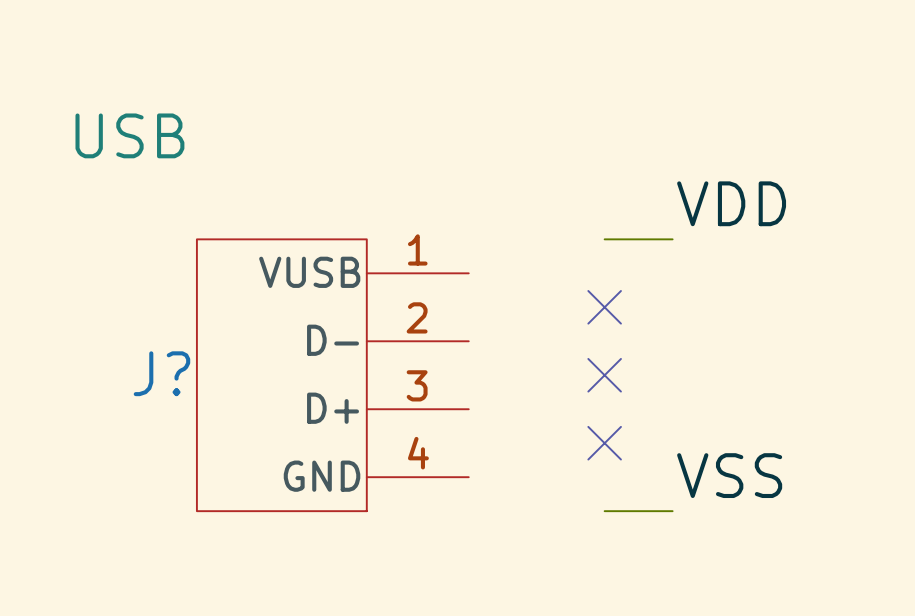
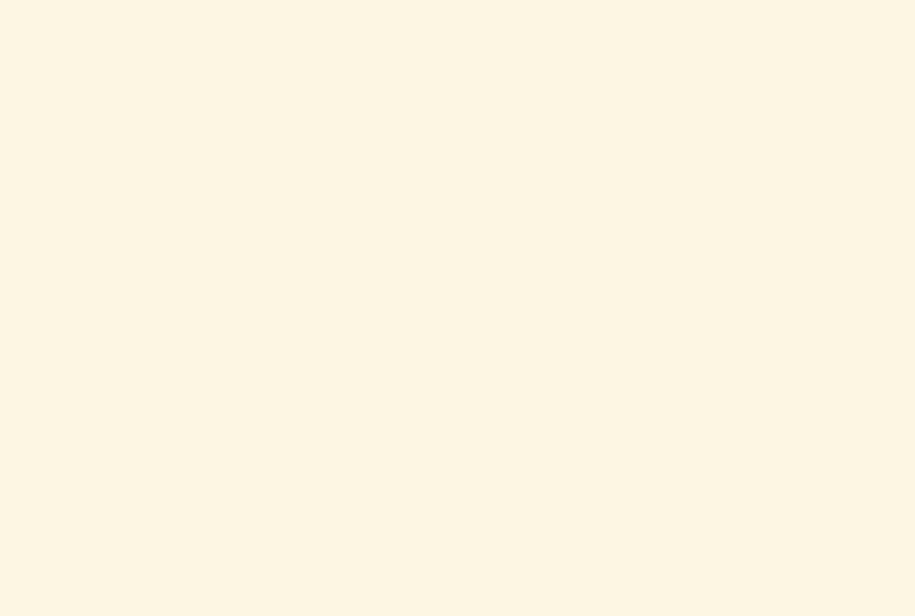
label: VDD (731, 203) -> none
wire: (604, 239) (672, 239) -> none
no-connect mark: (604, 307) -> none
J?: USB (332, 375) -> none
no-connect mark: (604, 375) -> none
no-connect mark: (604, 443) -> none
label: VSS (729, 475) -> none
wire: (604, 511) (672, 511) -> none

